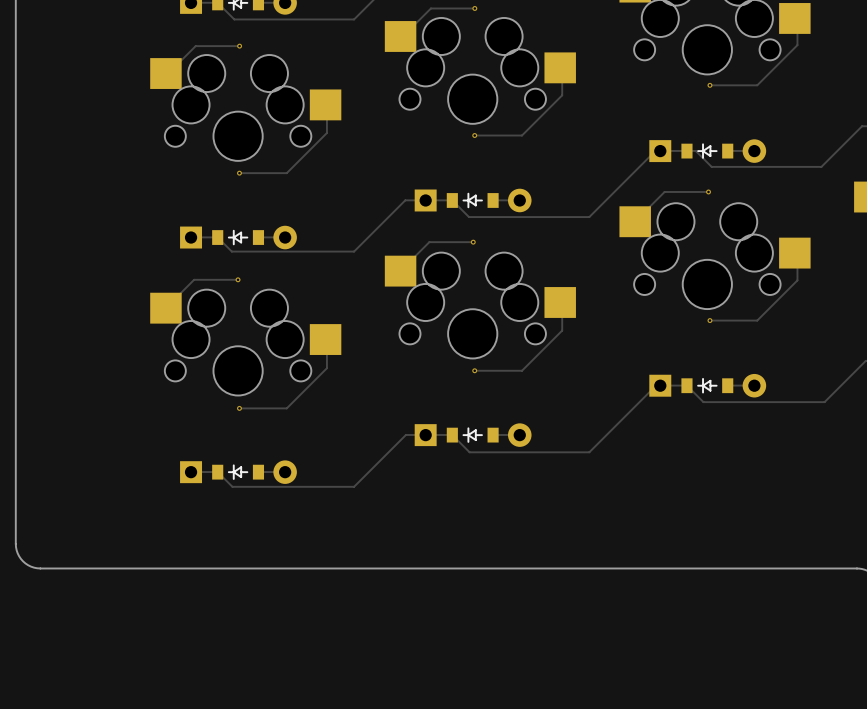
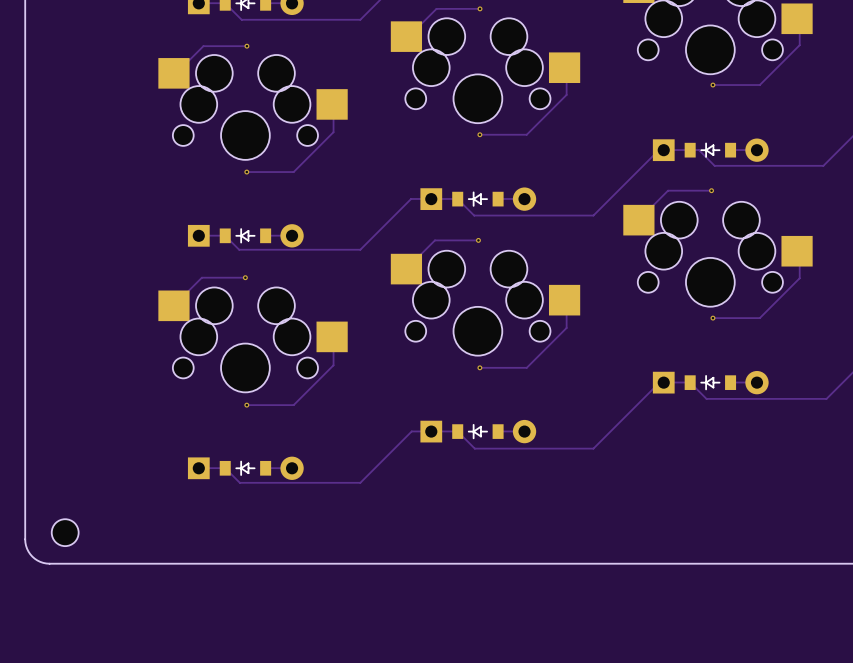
part: none -> (65, 532)

